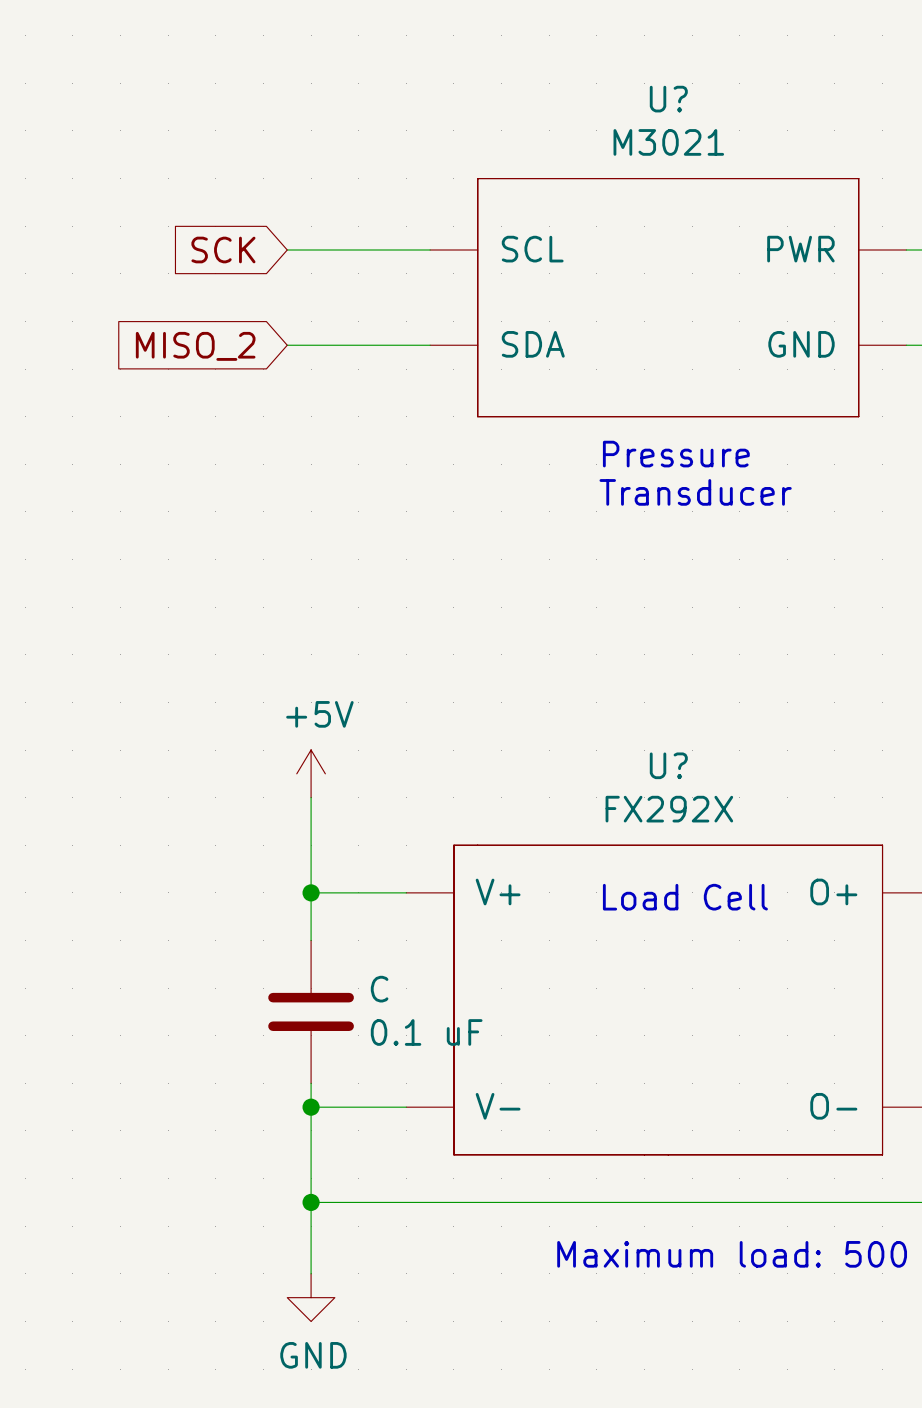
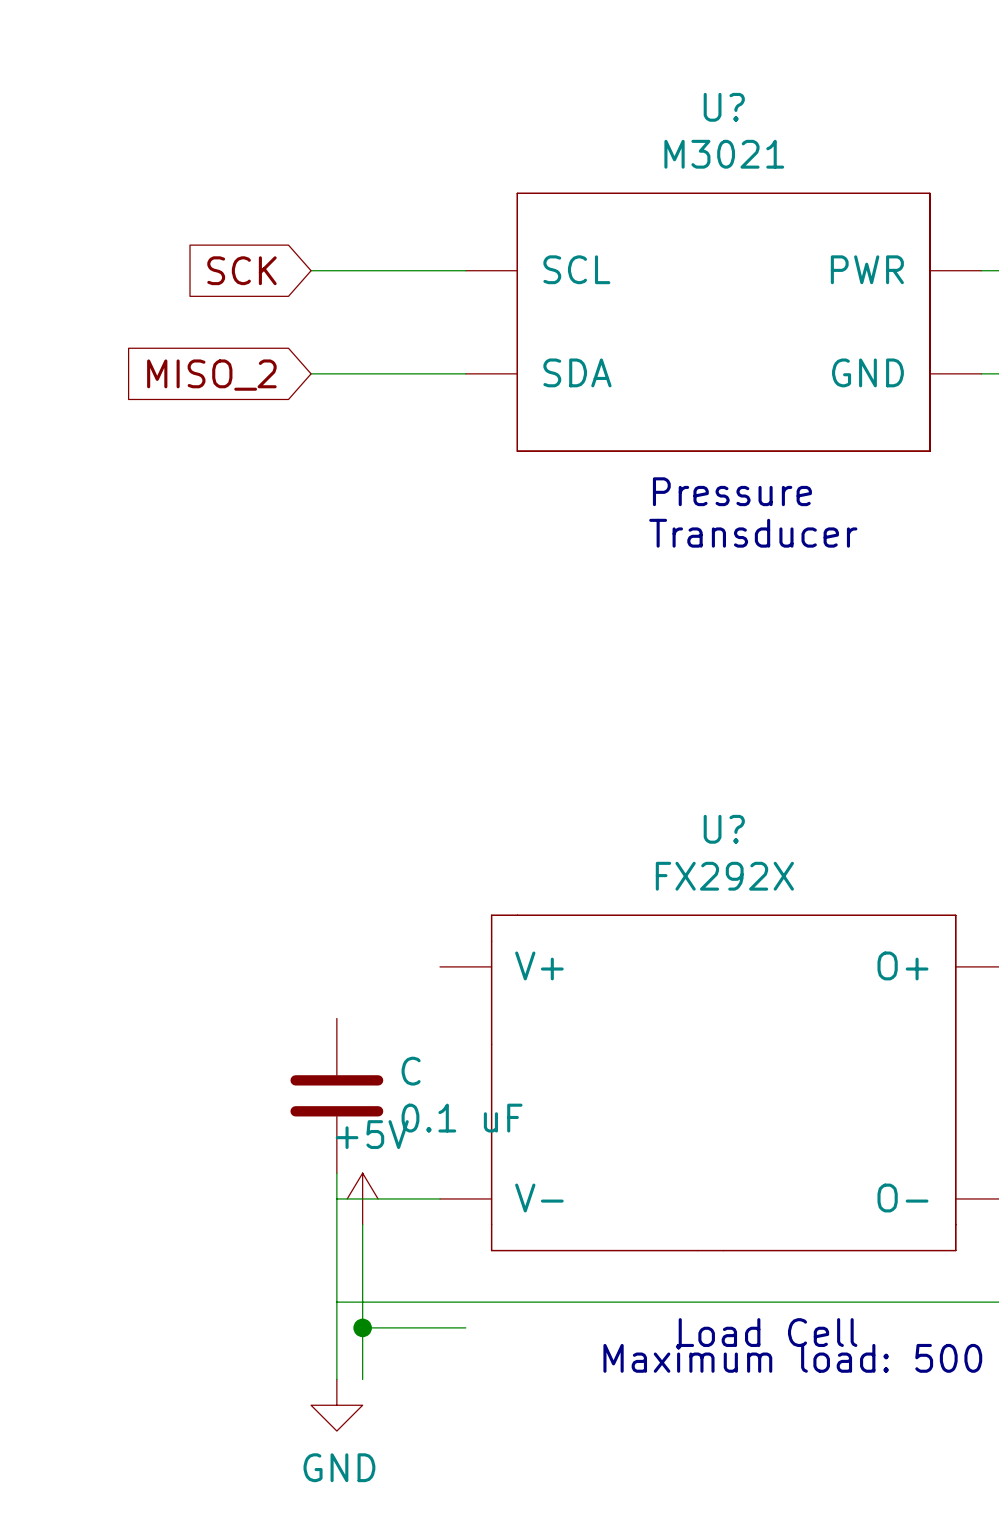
power symbol position: +5V (311, 773) -> +5V (362, 1198)
wire: (311, 797) (311, 940) -> (362, 1224) (362, 1379)
wire: (311, 892) (406, 892) -> (362, 1327) (465, 1327)
junction: (311, 892) -> none
text position: Load Cell (685, 897) -> Load Cell (768, 1332)
junction: (311, 1107) -> none
junction position: (311, 1202) -> (362, 1327)

